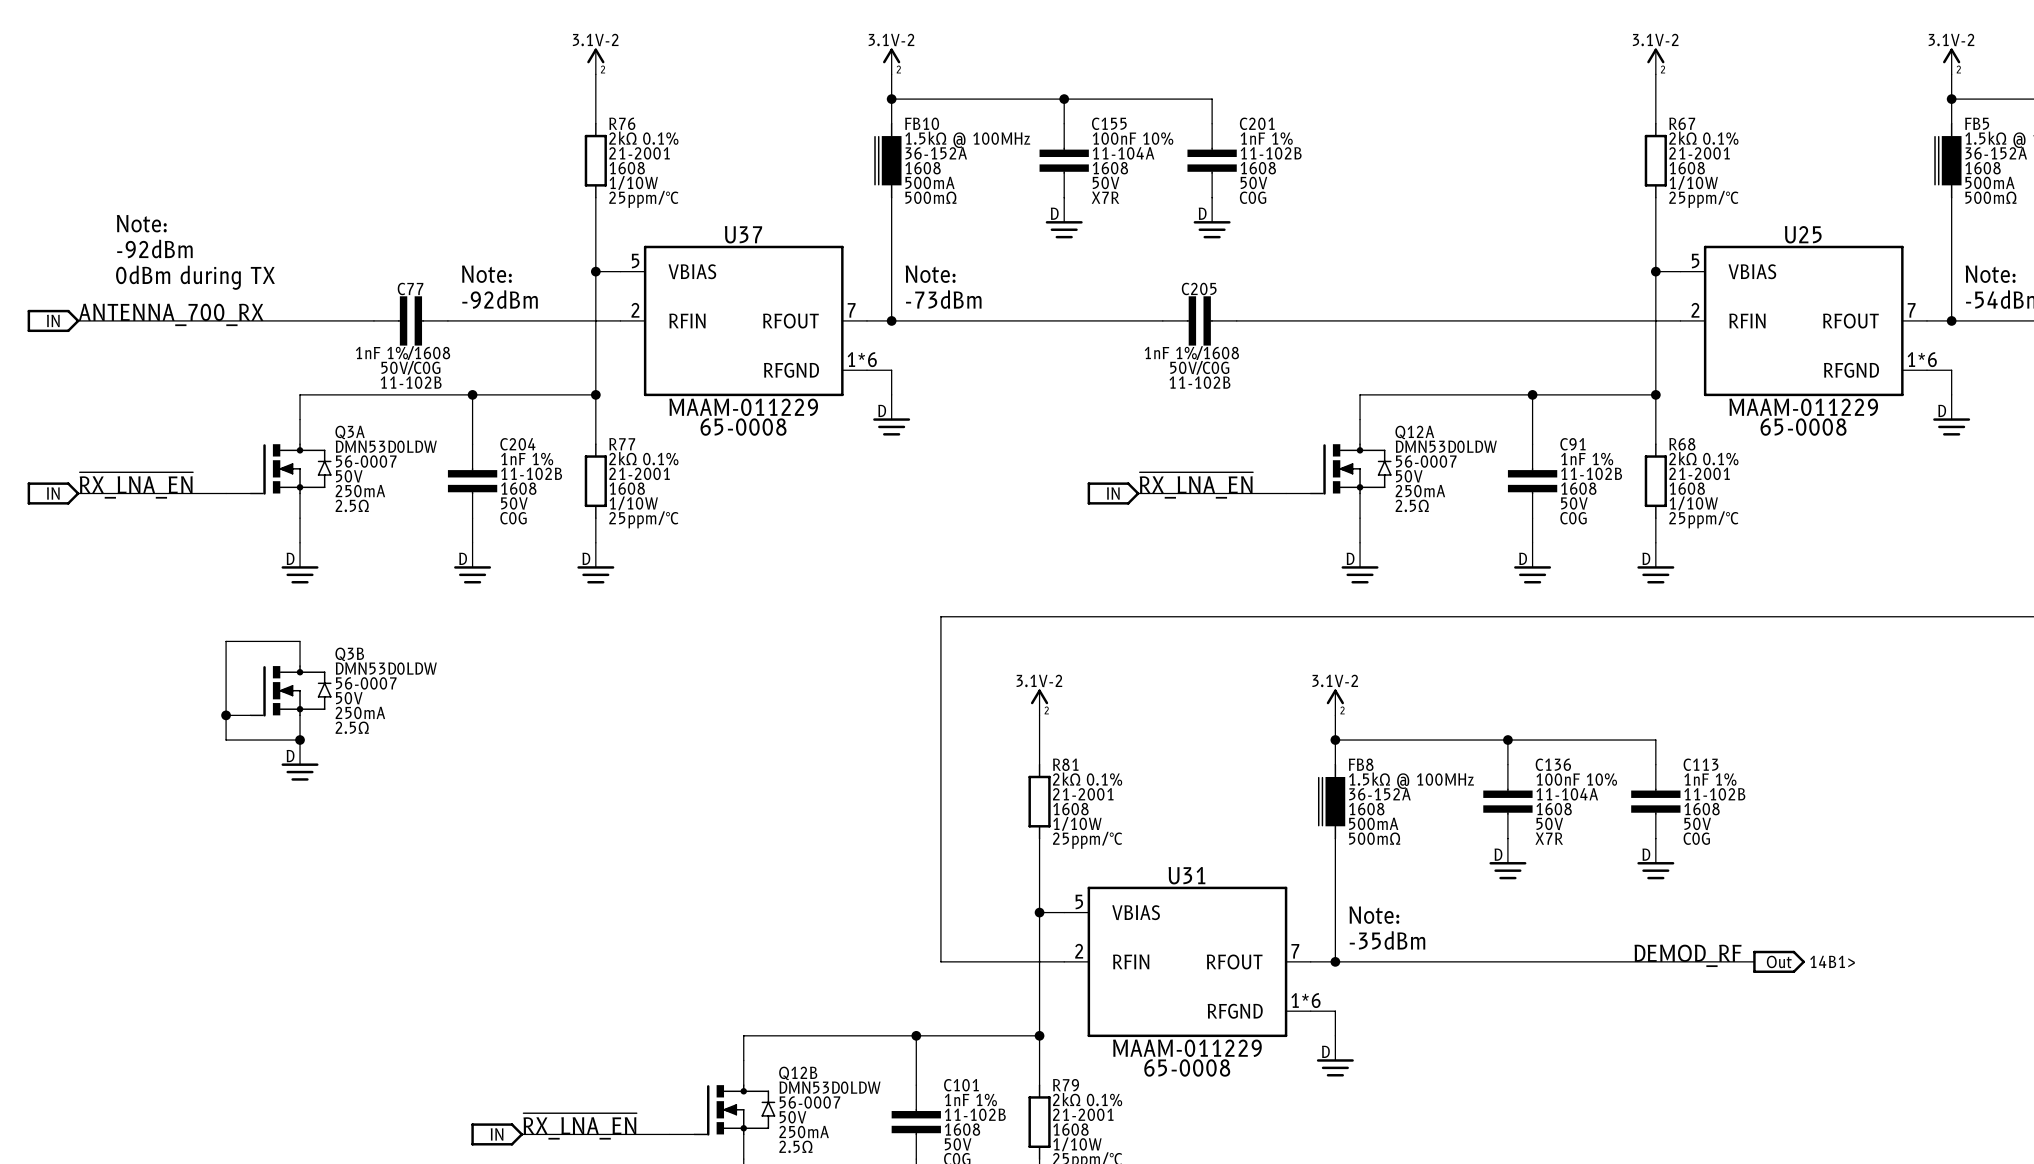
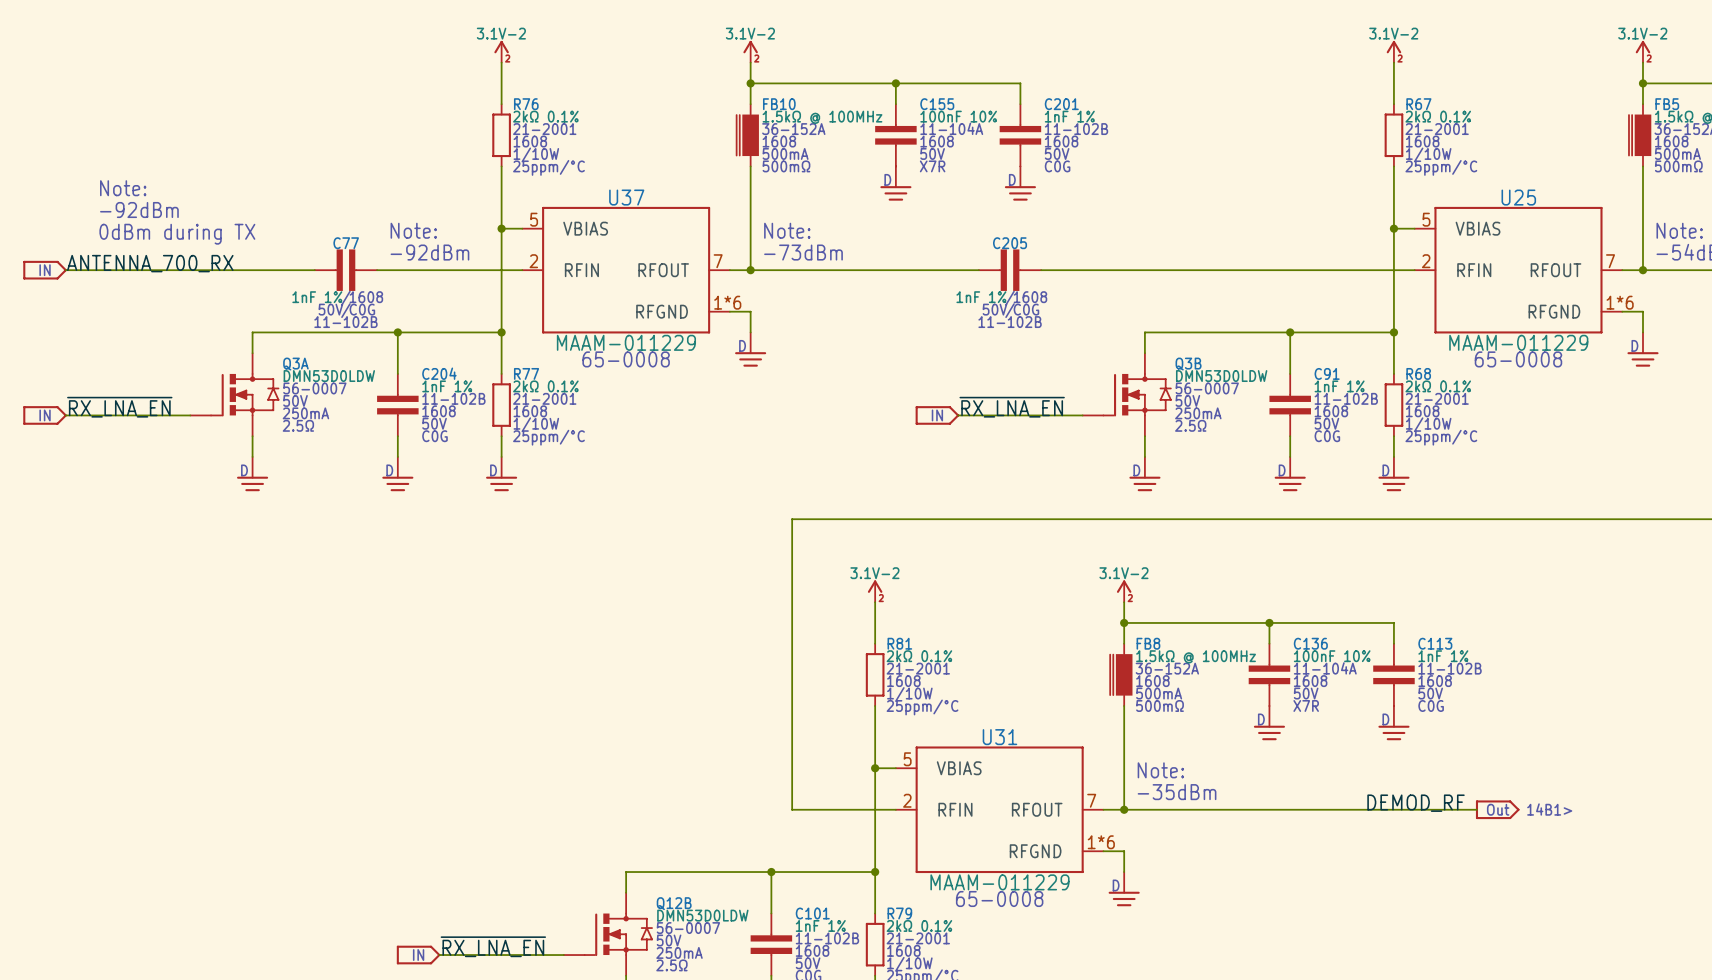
Q12A name: Q12A (1414, 432) -> Q3B (1188, 364)
wire: (300, 641) (226, 641) (226, 740) (300, 740) -> none
Q3B: DMN53D0LDW (278, 690) -> none
junction: (226, 715) -> none
junction: (300, 740) -> none
power symbol: (300, 760) -> none

